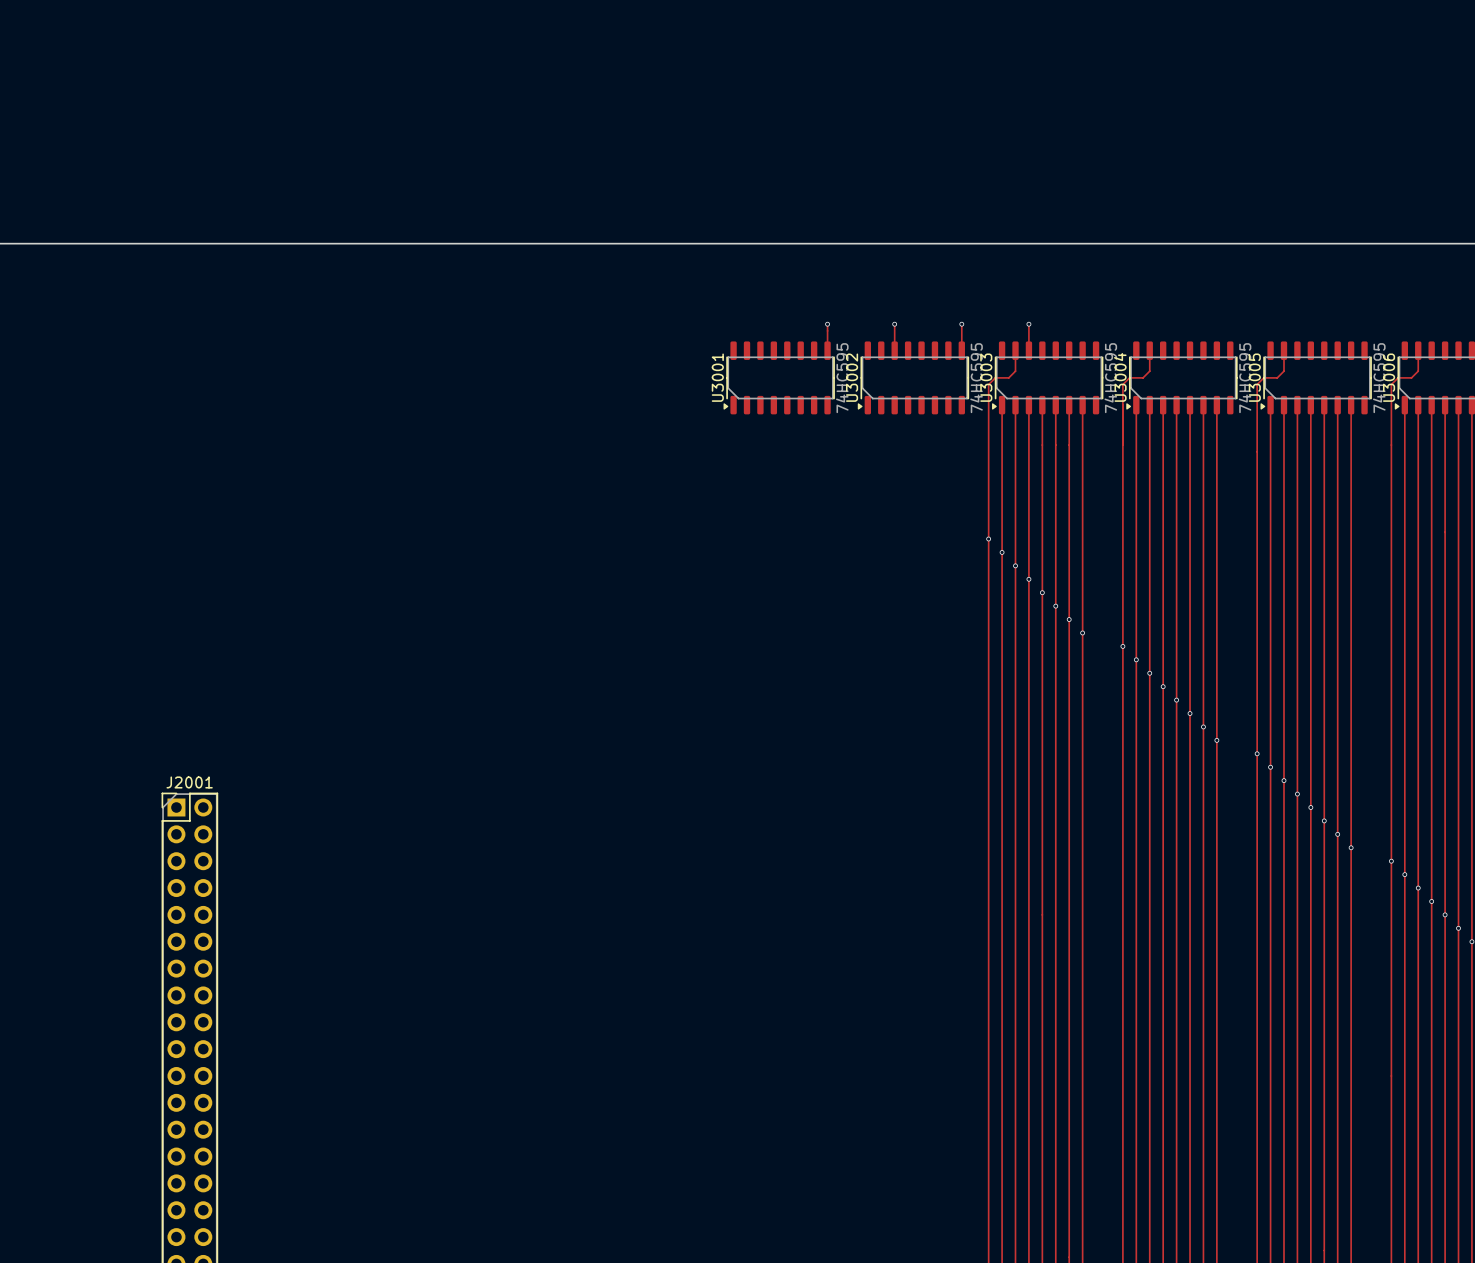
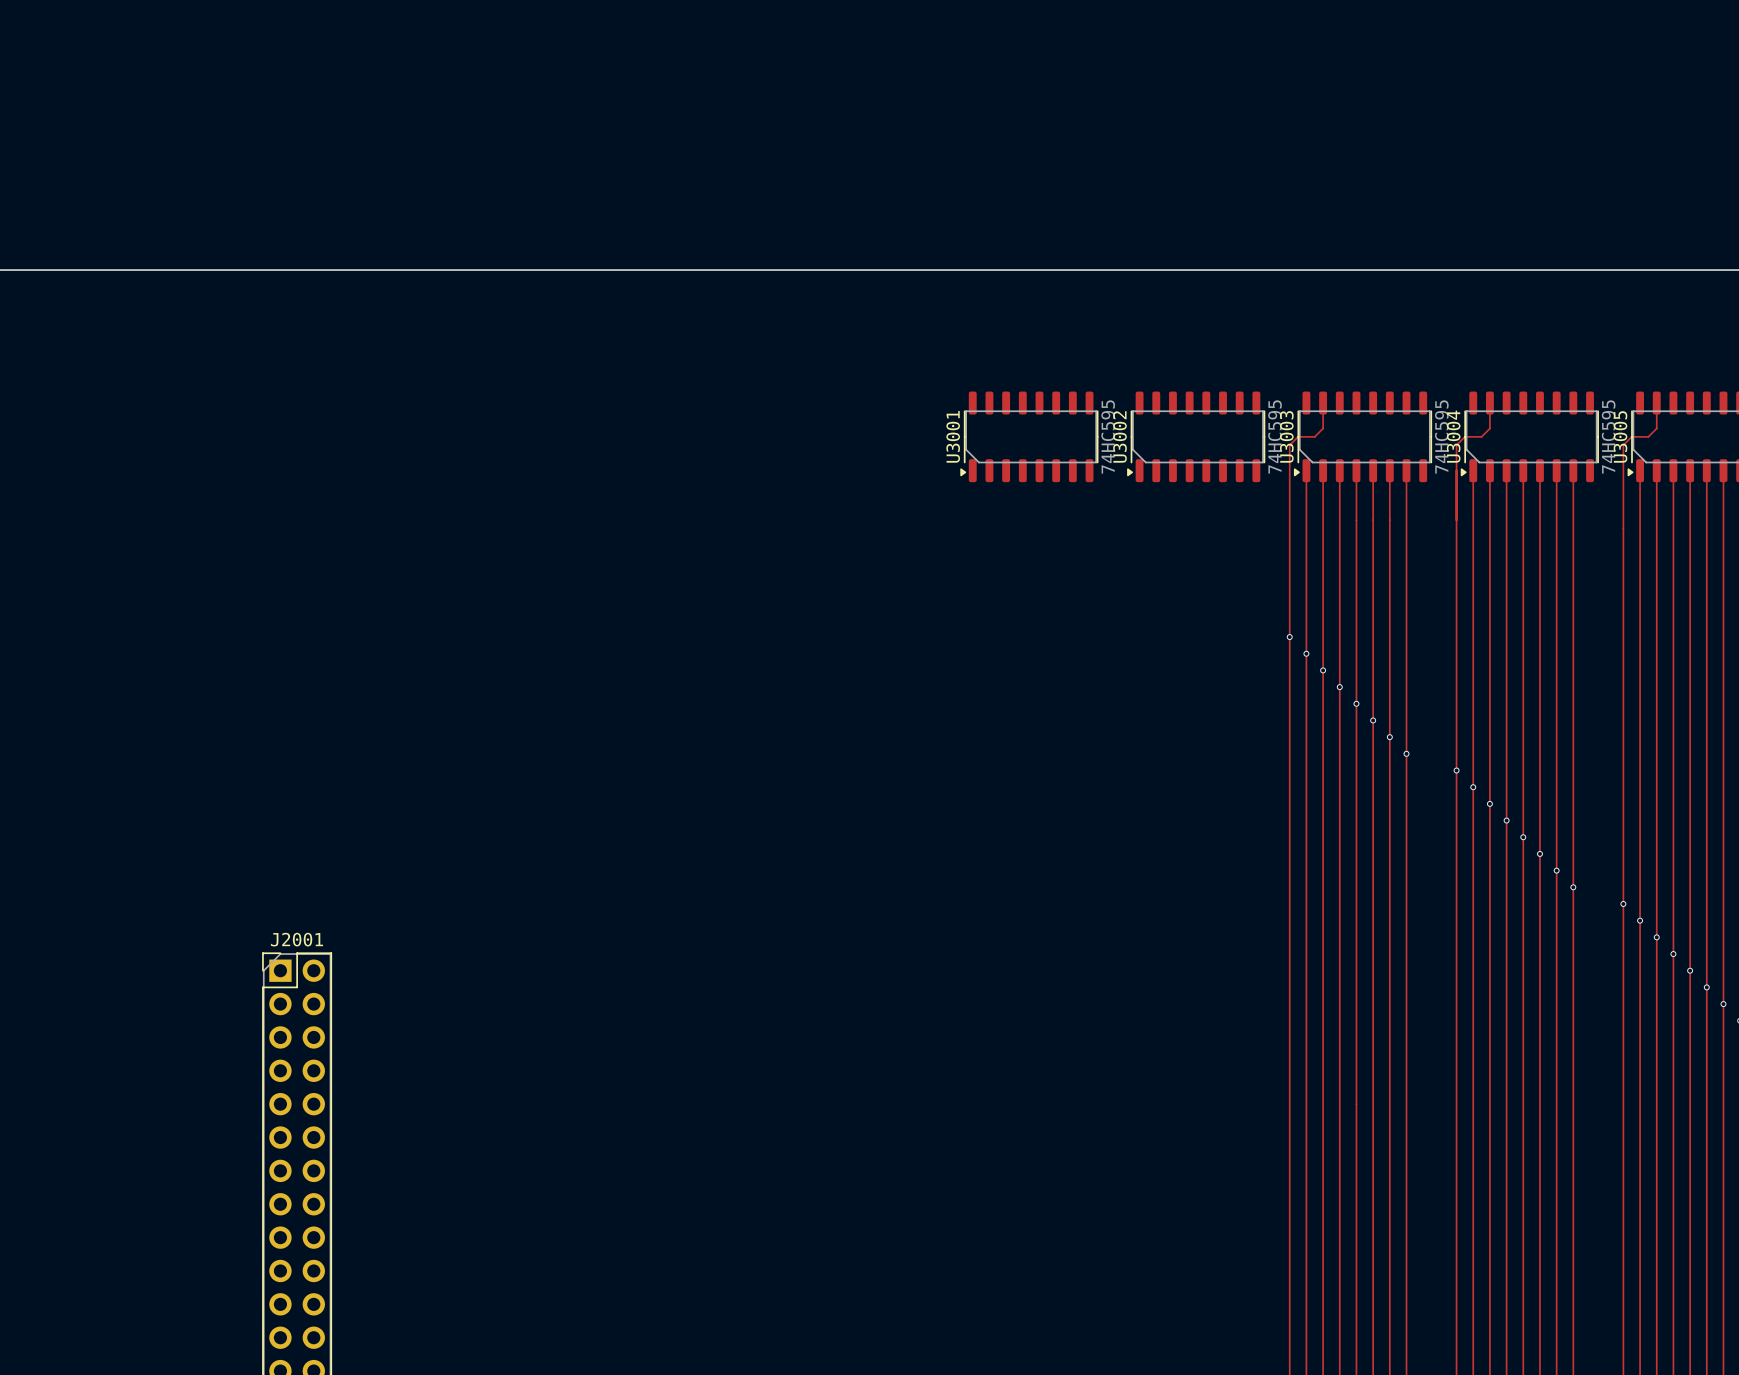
track: (827, 324) (827, 350) -> none
via: (827, 324) -> none
track: (894, 324) (894, 350) -> none
via: (894, 324) -> none
track: (961, 324) (961, 350) -> none
via: (961, 324) -> none
track: (1028, 324) (1028, 350) -> none
via: (1028, 324) -> none

